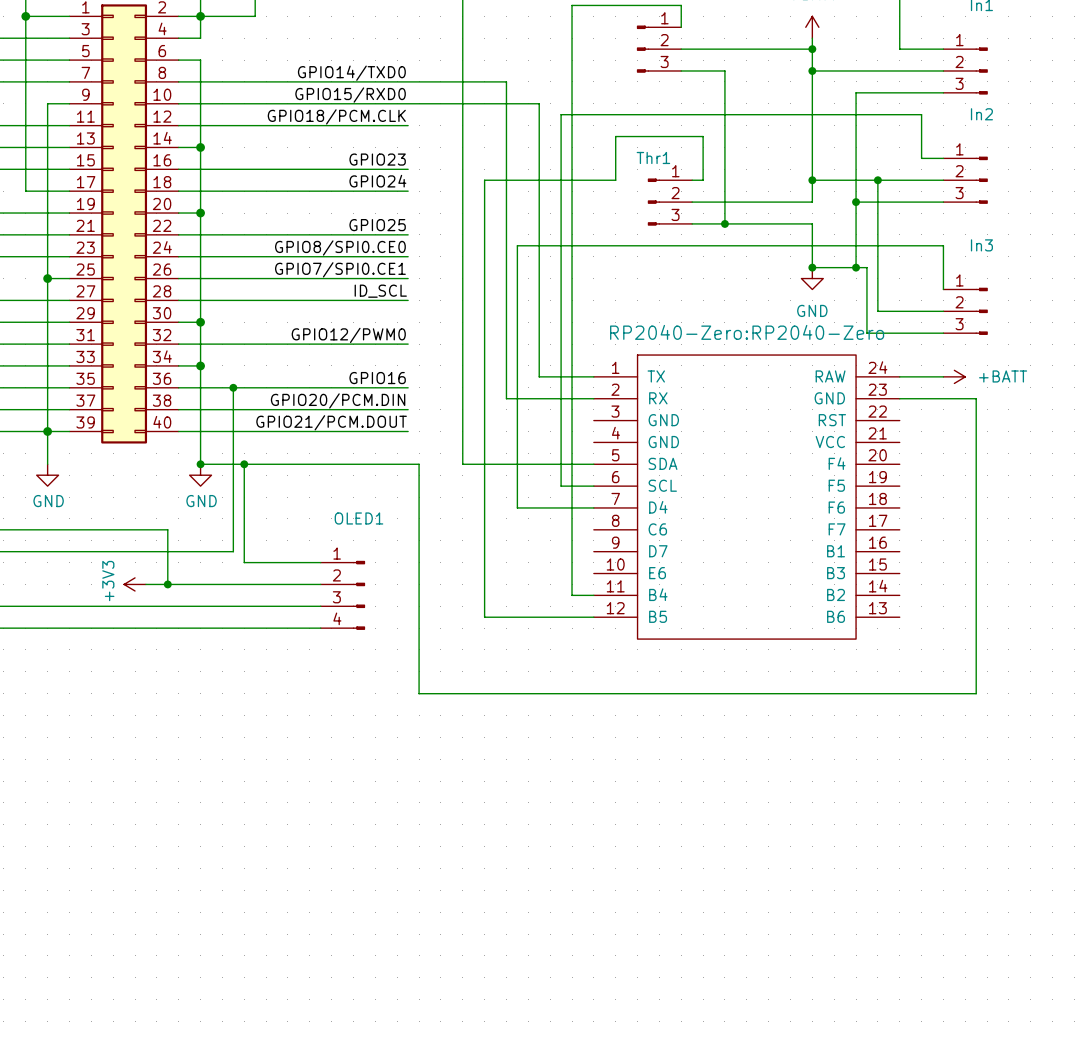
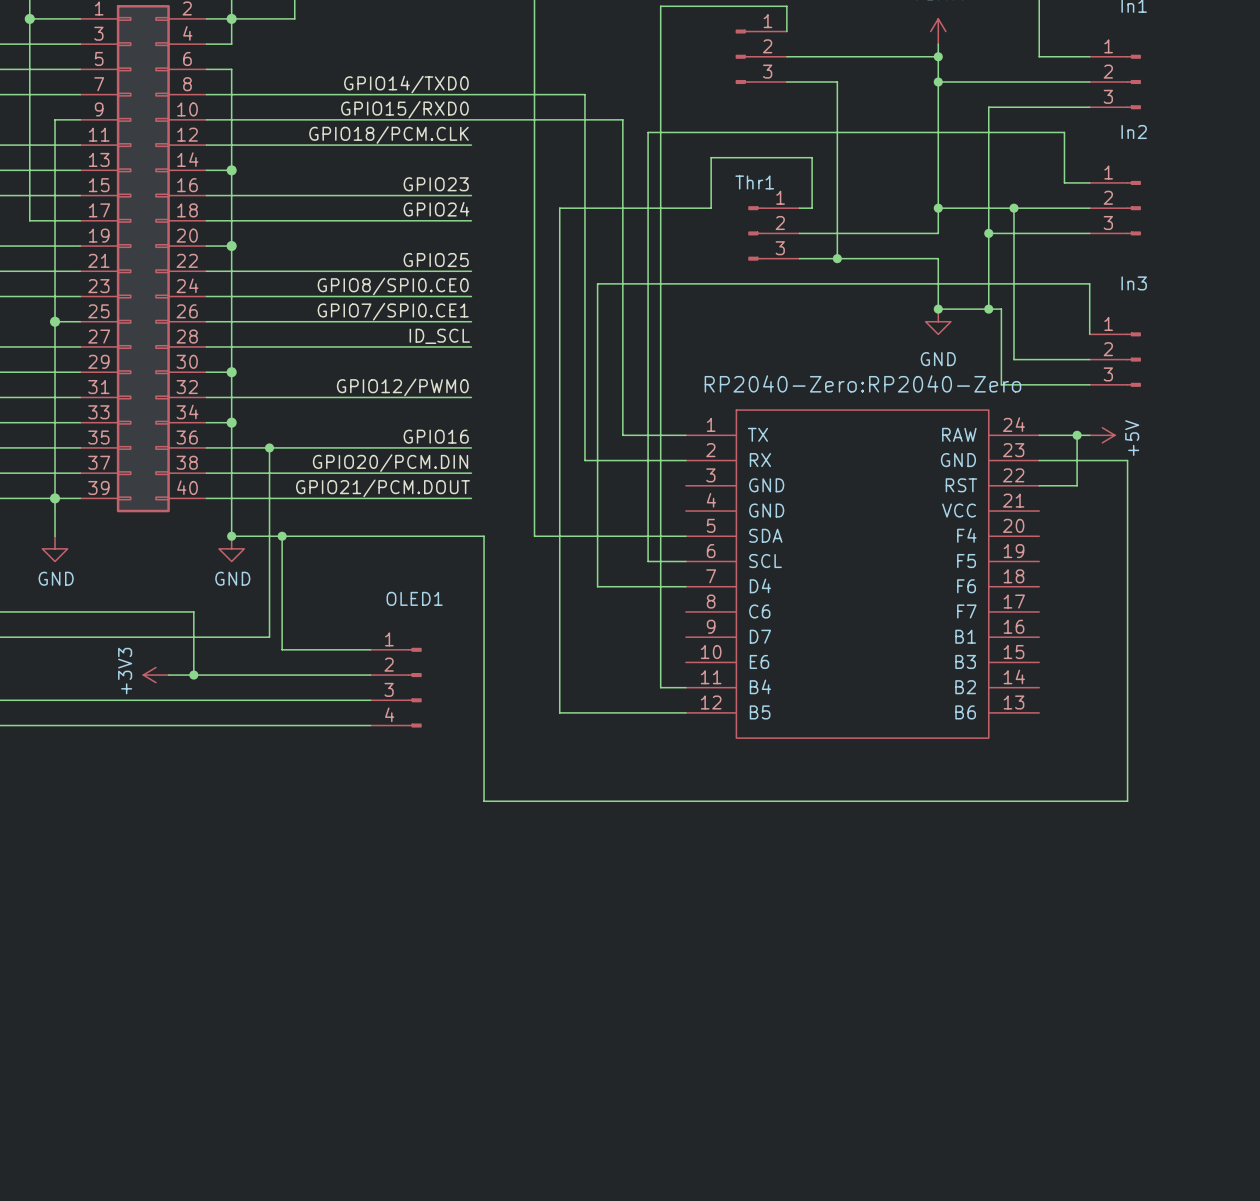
wire: none -> (1077, 435) (1077, 485) (1039, 485)
junction: none -> (1077, 435)
power symbol: +BATT (954, 376) -> +5V (1102, 435)

